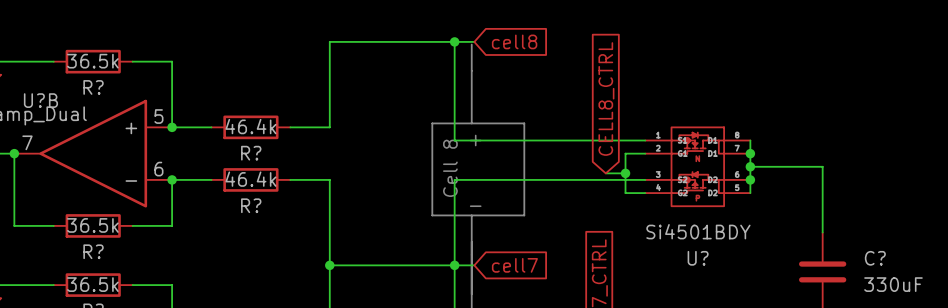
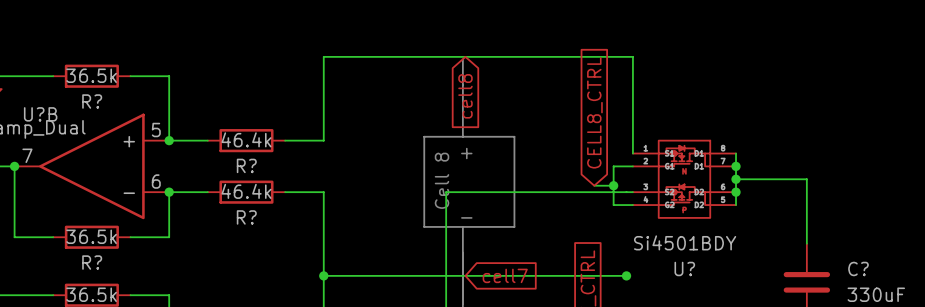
wire: (454, 41) (454, 140) (645, 140) -> (465, 56) (632, 56) (632, 153)
junction: (454, 41) -> none
global label rotation: 0° (514, 41) -> 90° clockwise (465, 96)
junction: (454, 265) -> none
wire: none -> (465, 275) (626, 275)
junction: none -> (626, 275)

